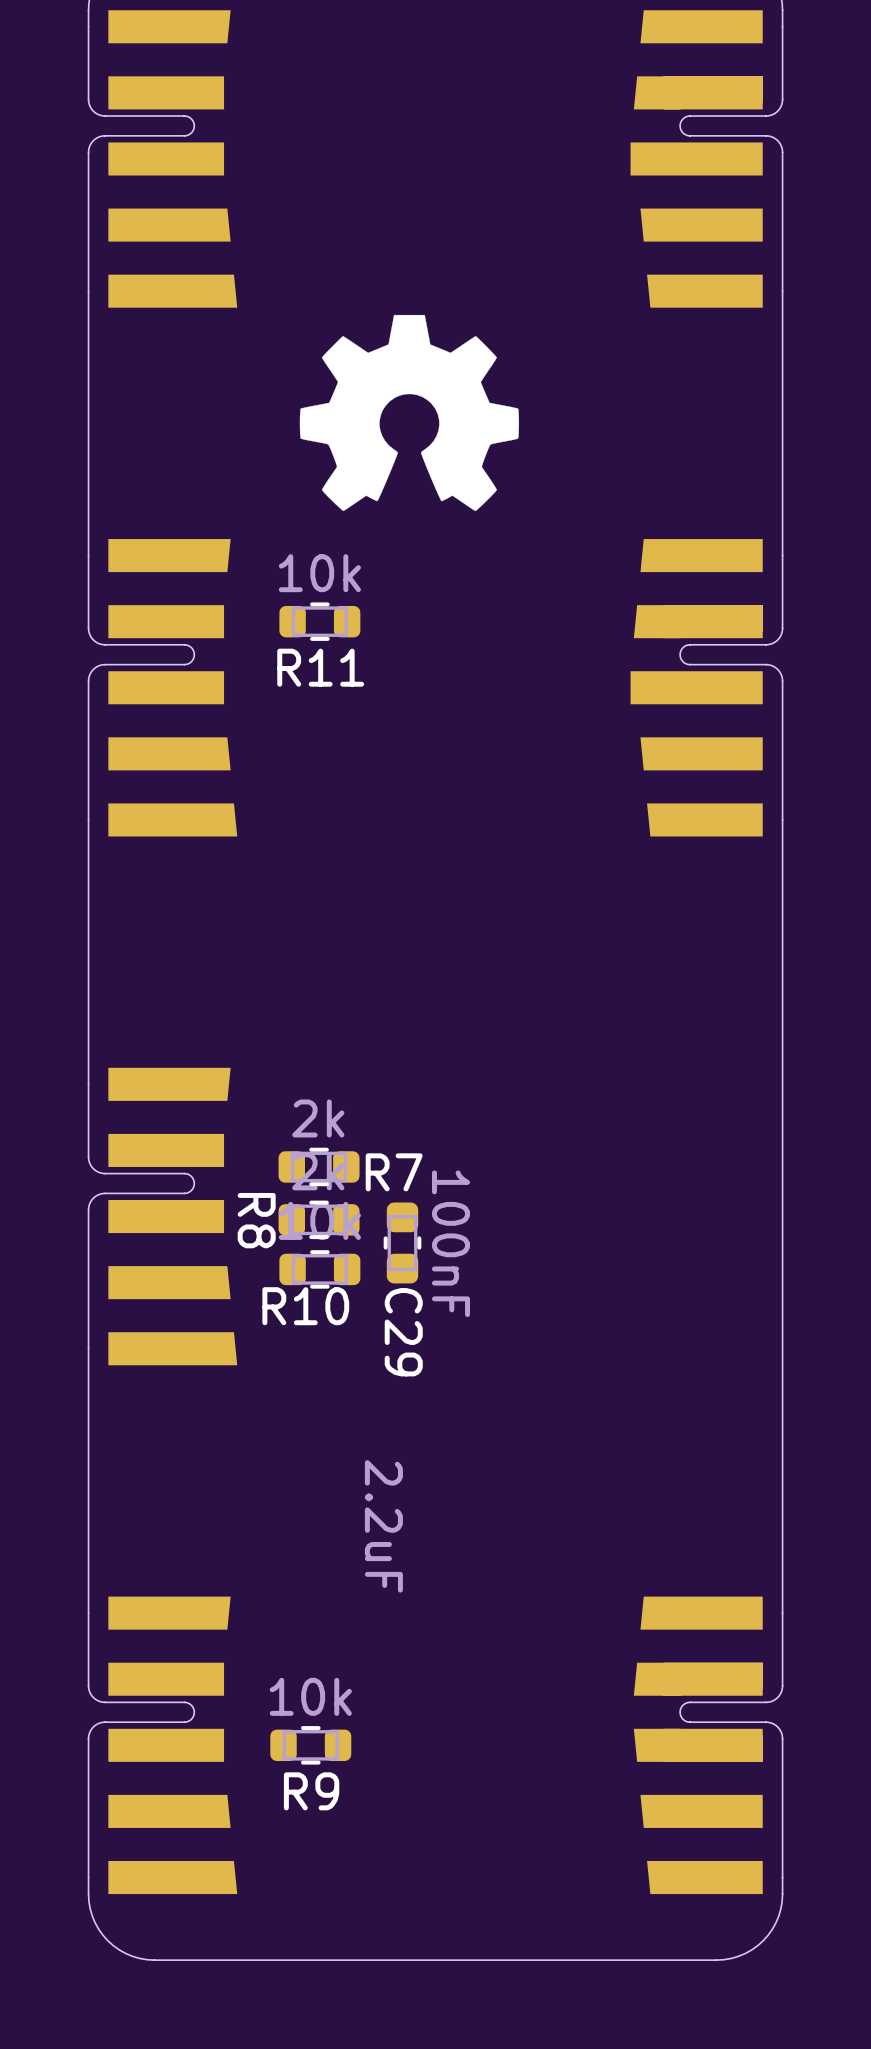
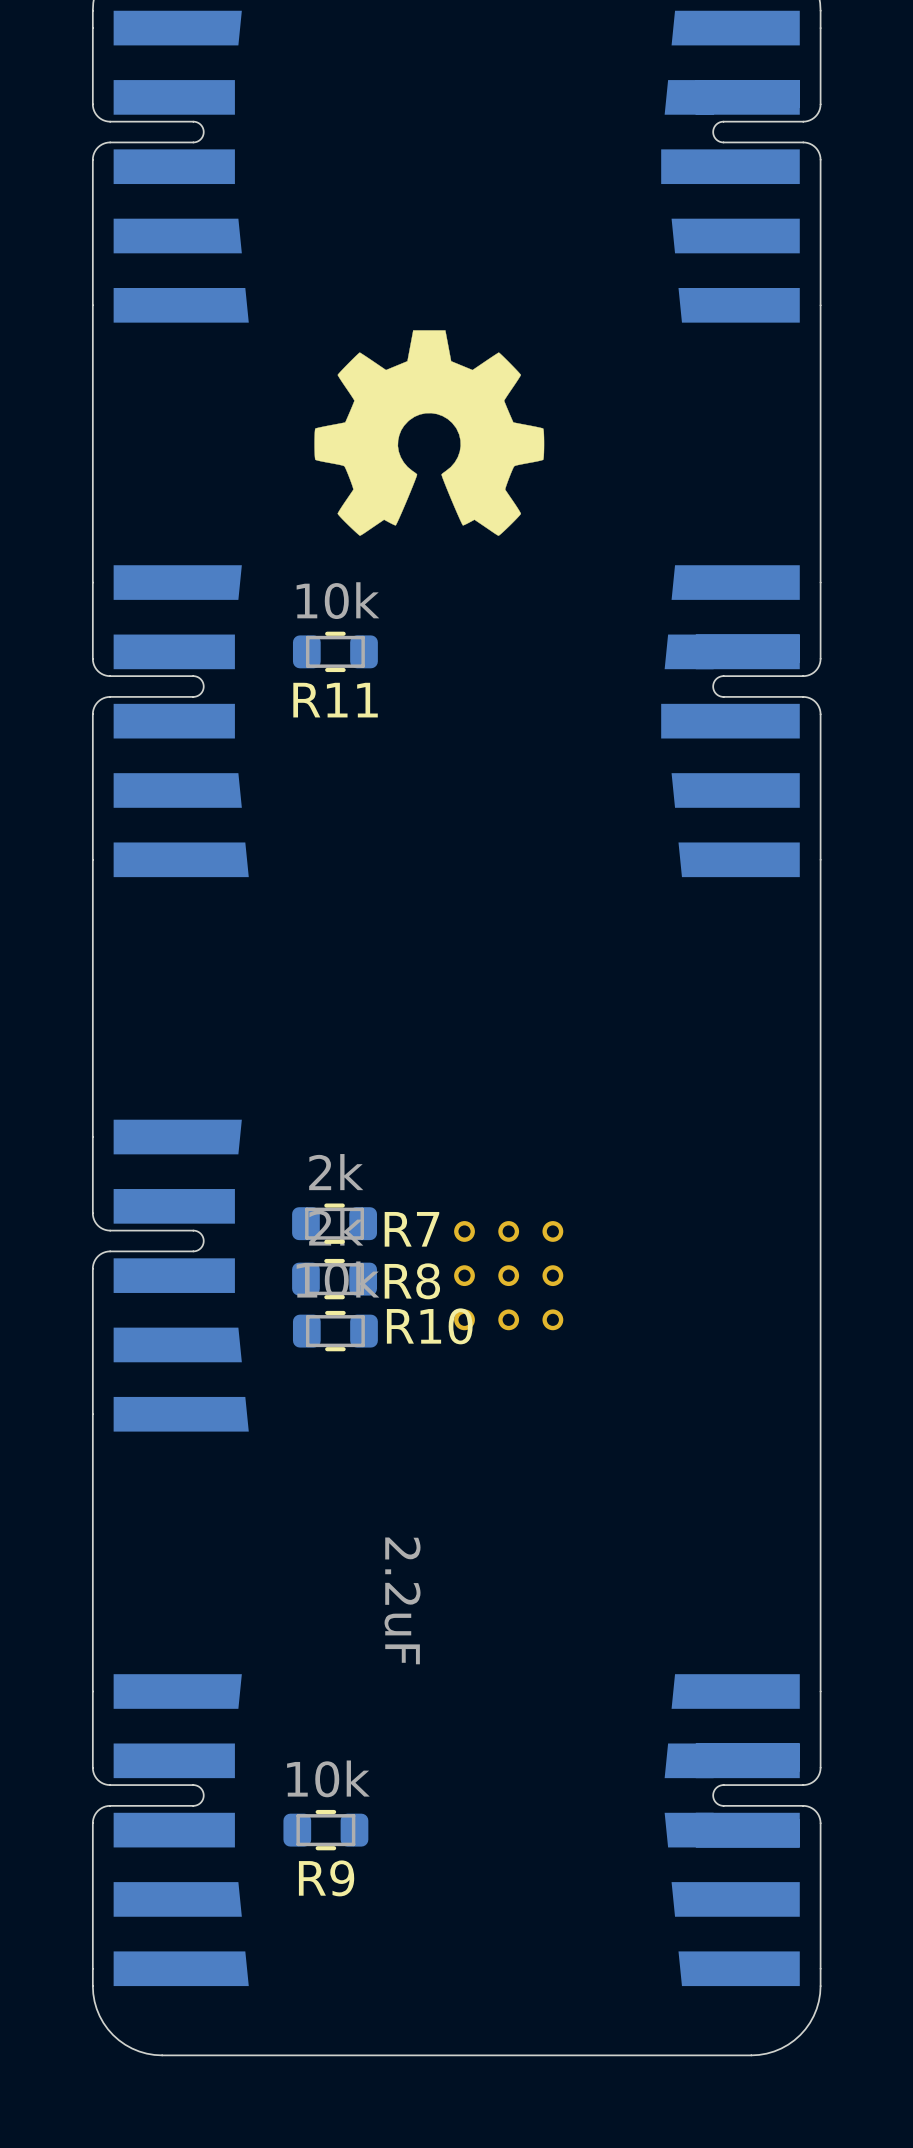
part: none -> (508, 1275)
R8 name rotation: 0° (256, 1220) -> 90° counterclockwise (412, 1281)
R8 name position: R8 (256, 1220) -> R8 (412, 1281)
C29: 100nF (402, 1242) -> none
R10 name position: R10 (305, 1306) -> R10 (429, 1326)

